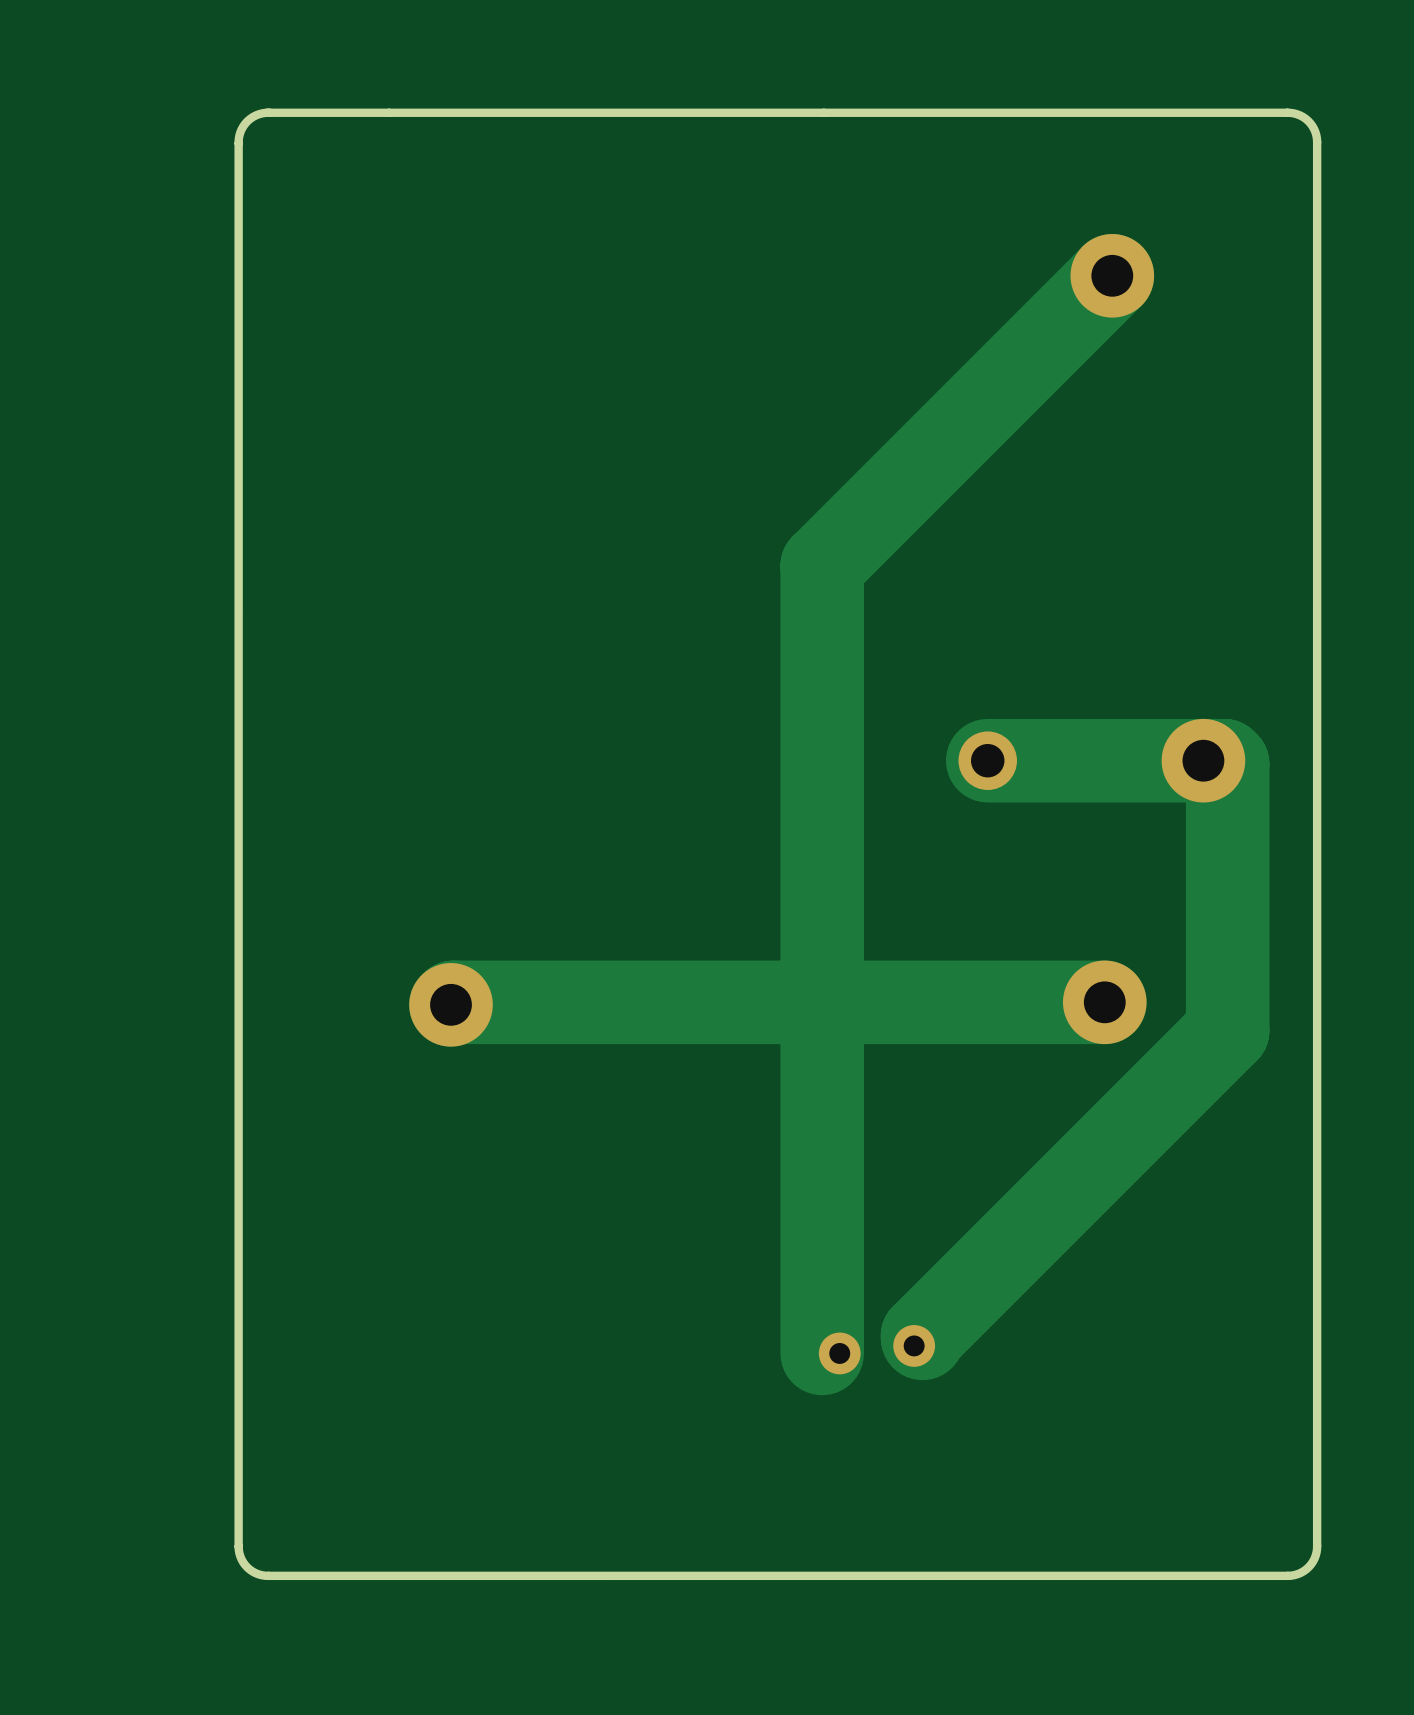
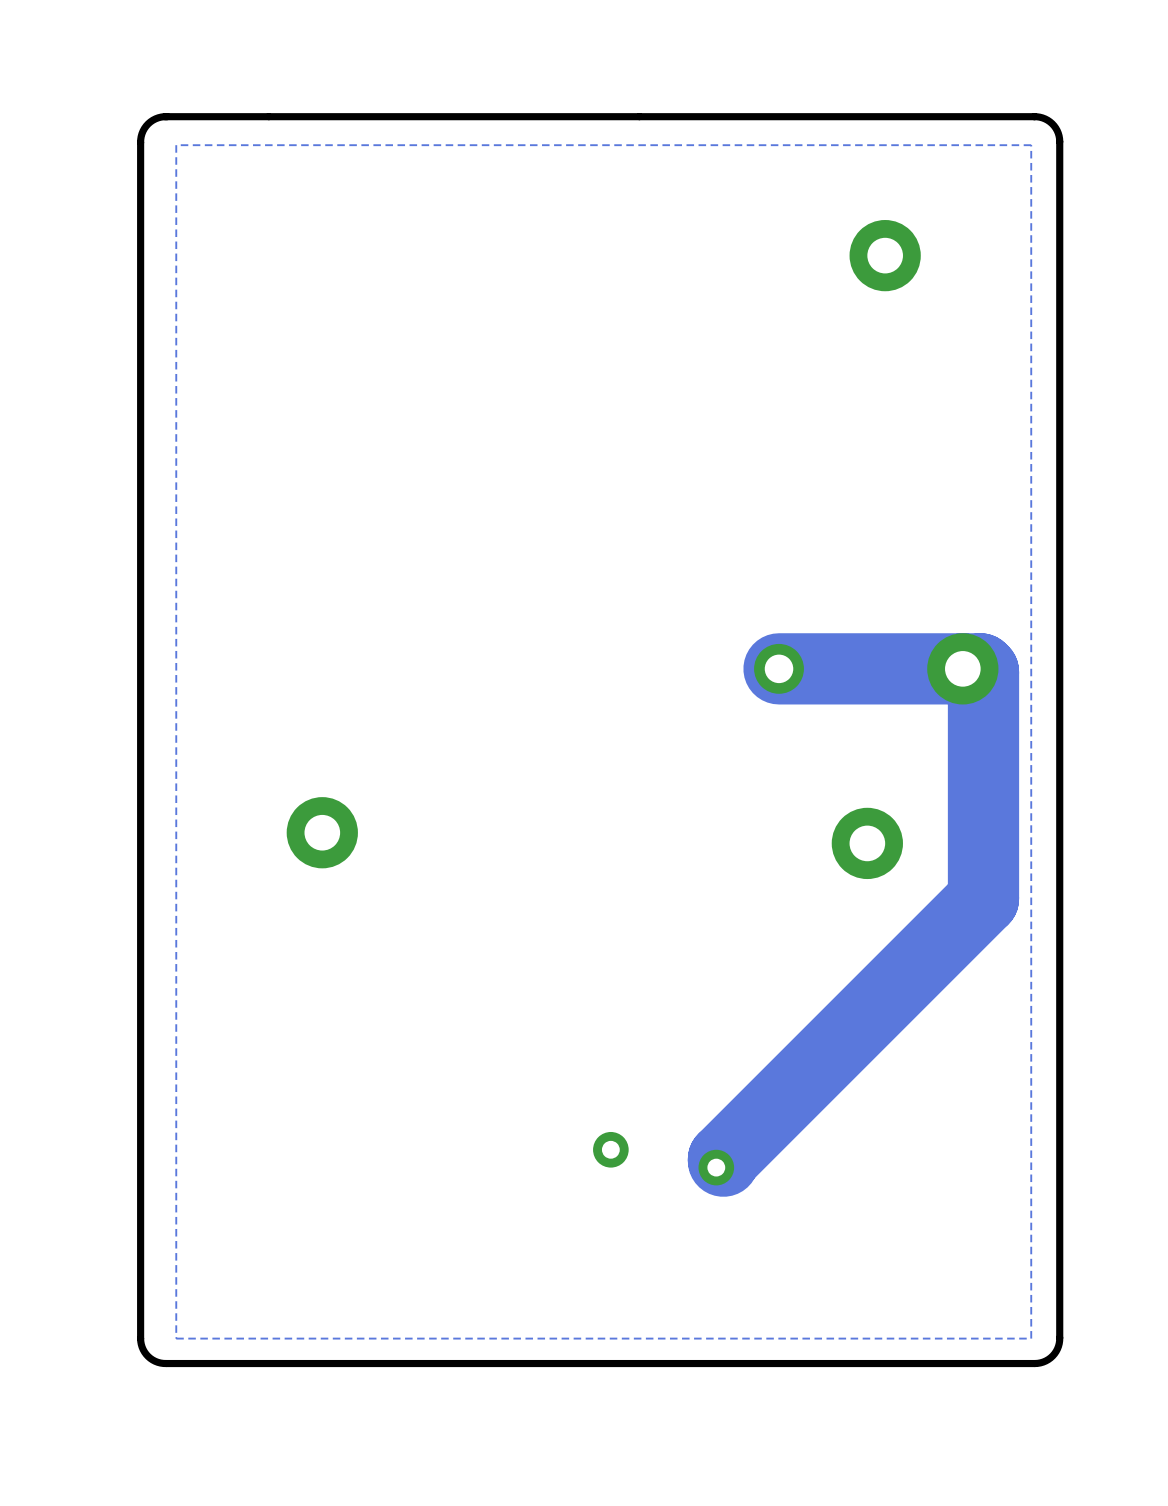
zone outline: none -> (1031, 145) (176, 145) (176, 1338) (1031, 1338) (1031, 145)
track: (1112, 275) (822, 565) (822, 1353) -> none
track: (1104, 1002) (453, 1002) (450, 1004) -> none
via position: (1104, 1002) -> (867, 843)
via position: (450, 1004) -> (322, 832)
via position: (839, 1353) -> (610, 1149)

